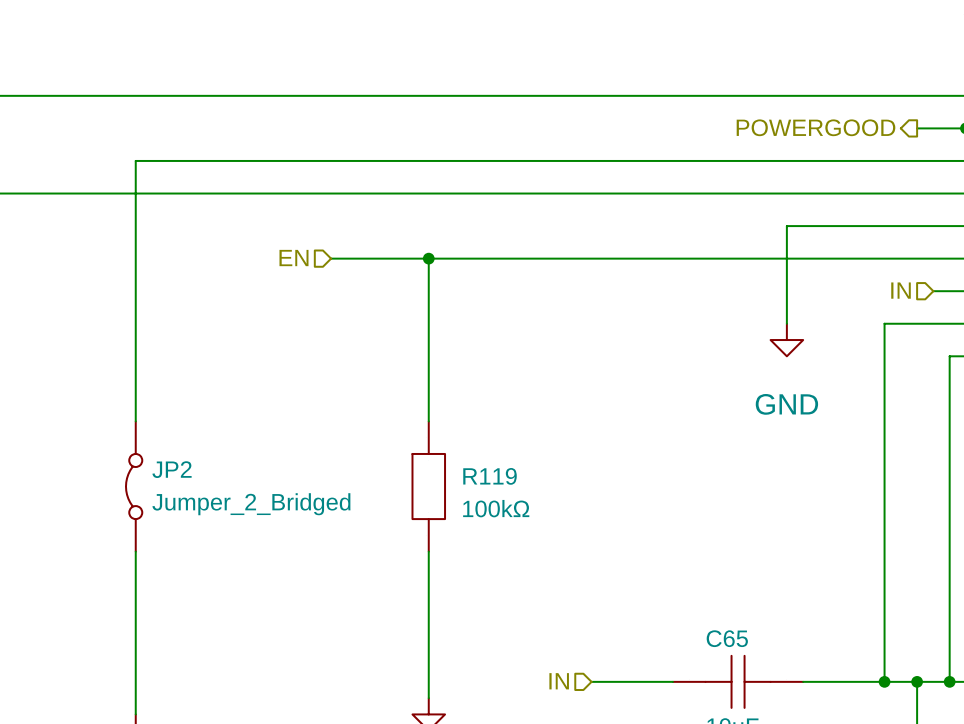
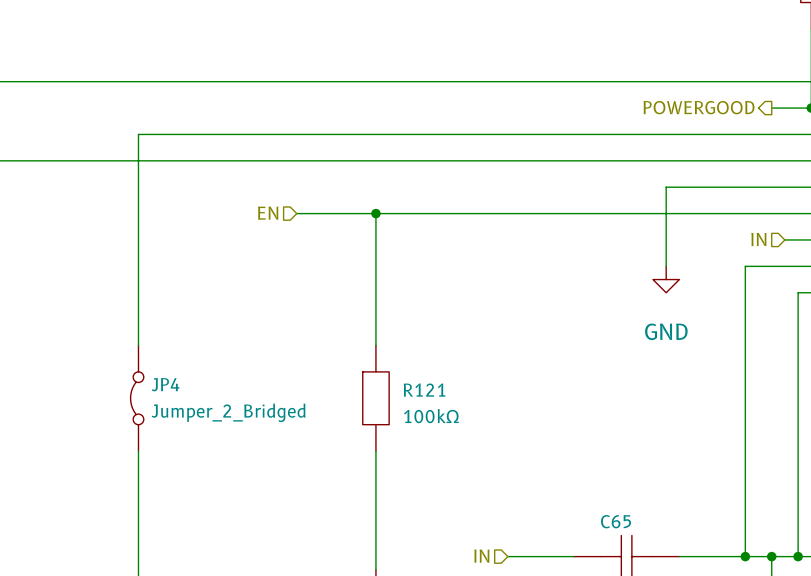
JP2 name: JP2 (172, 469) -> JP4 (165, 384)
R119 name: R119 (490, 476) -> R121 (424, 390)

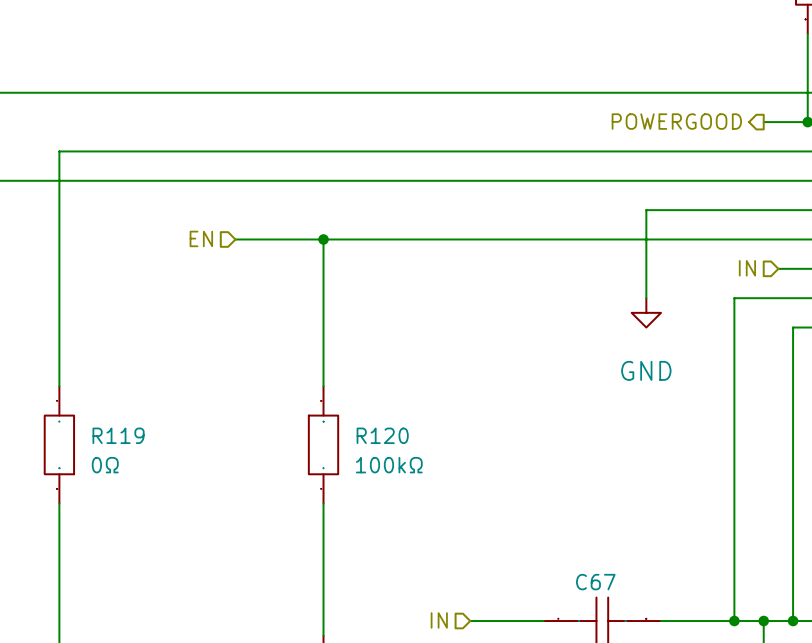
R121 name: R121 (424, 390) -> R120 (382, 435)
JP4: Jumper_2_Bridged (137, 398) -> none
R119: none -> 0Ω (59, 444)
C65 name: C65 (616, 521) -> C67 (595, 582)

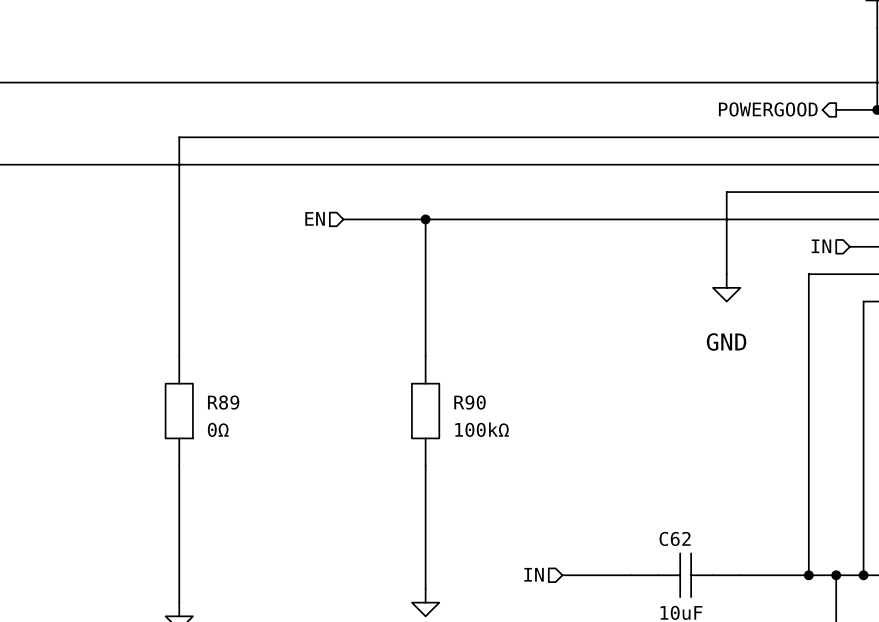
R119 name: R119 (118, 435) -> R89 (223, 402)
R120 name: R120 (382, 435) -> R90 (469, 402)
C67 name: C67 (595, 582) -> C62 (675, 538)

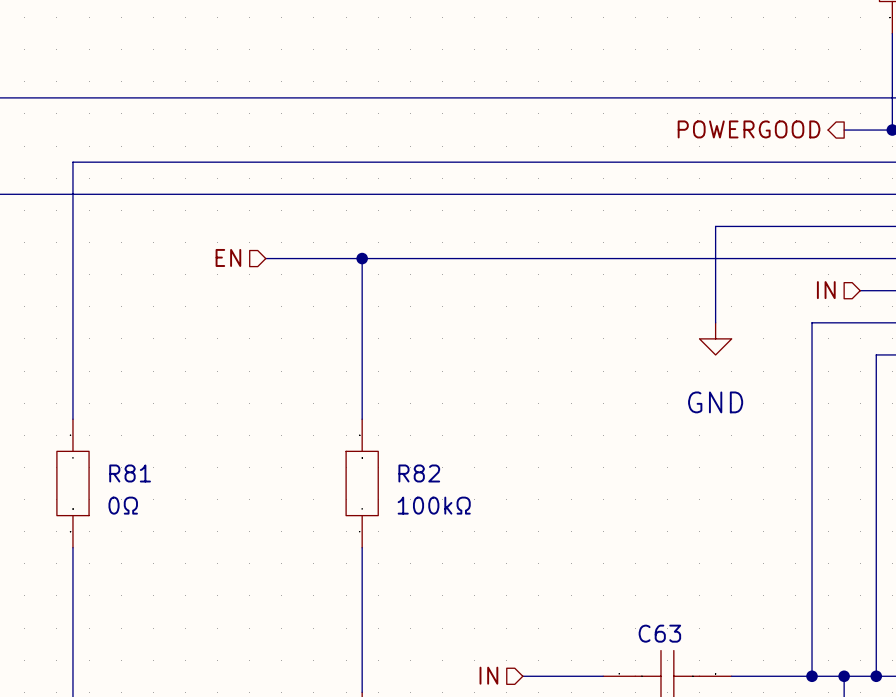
R89 name: R89 (223, 402) -> R81 (130, 473)
R90 name: R90 (469, 402) -> R82 (419, 473)
C62 name: C62 (675, 538) -> C63 (659, 633)

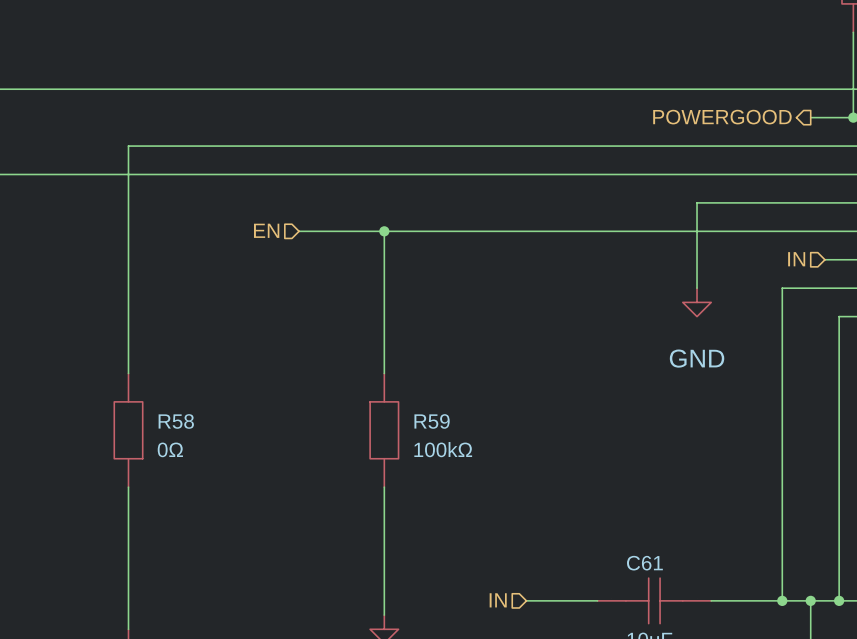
R81 name: R81 (130, 473) -> R58 (176, 421)
R82 name: R82 (419, 473) -> R59 (432, 421)
C63 name: C63 (659, 633) -> C61 (644, 563)

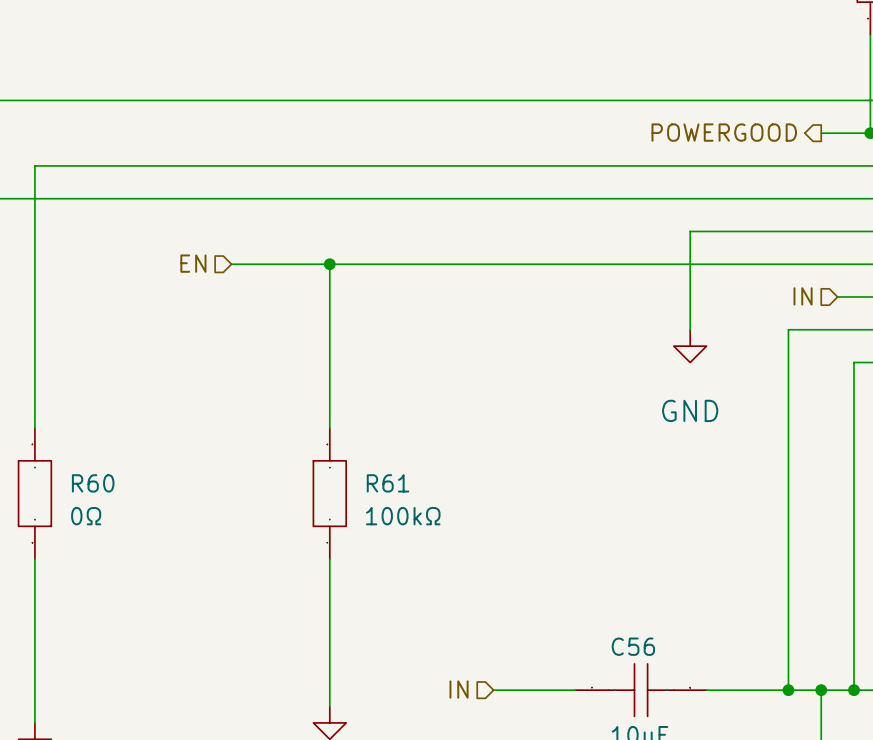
R58 name: R58 (176, 421) -> R60 (93, 483)
R59 name: R59 (432, 421) -> R61 (388, 483)
C61 name: C61 (644, 563) -> C56 (633, 646)

